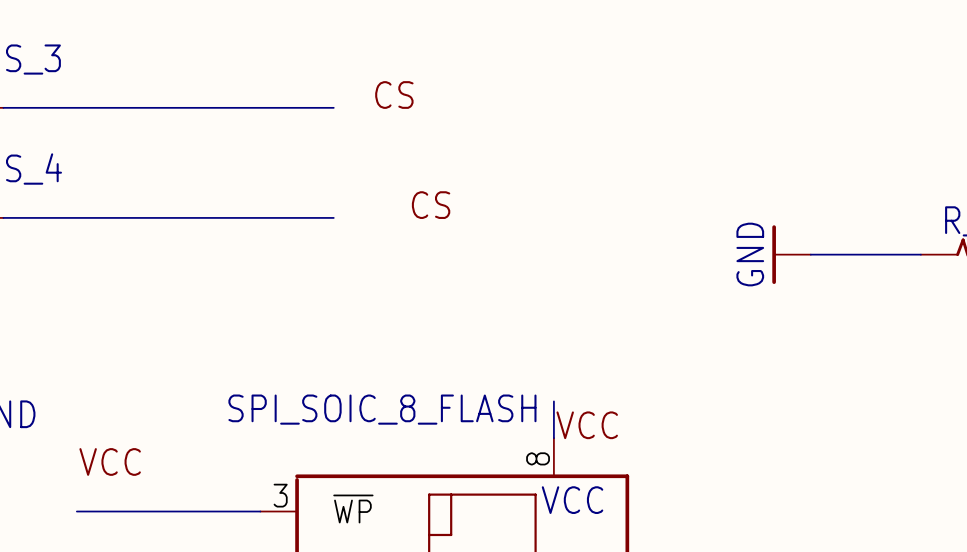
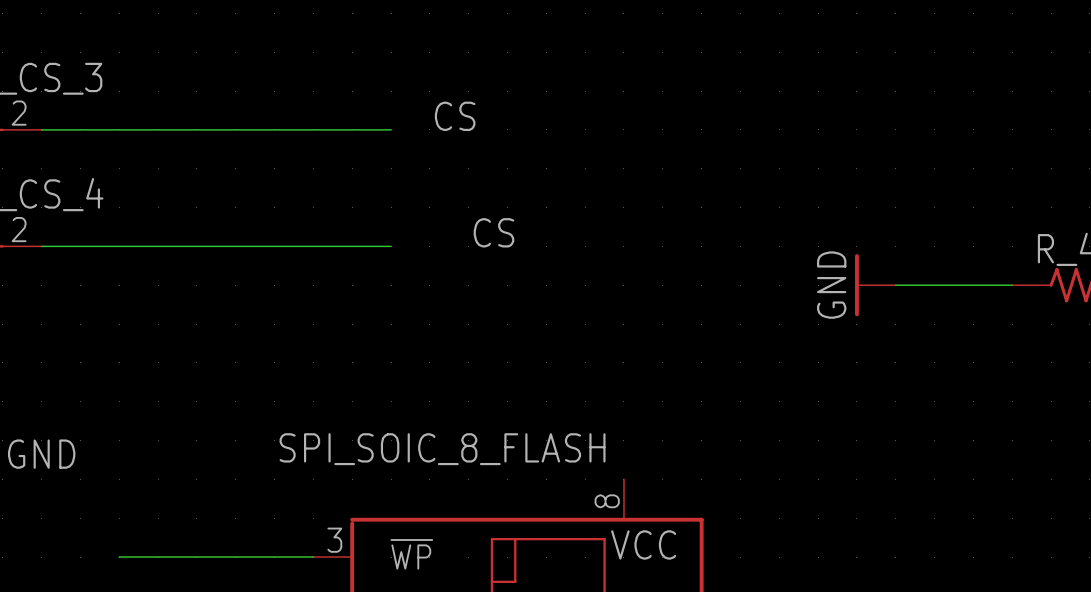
wire: (553, 401) (553, 438) -> none
label: VCC (587, 425) -> none
label: VCC (110, 461) -> none

